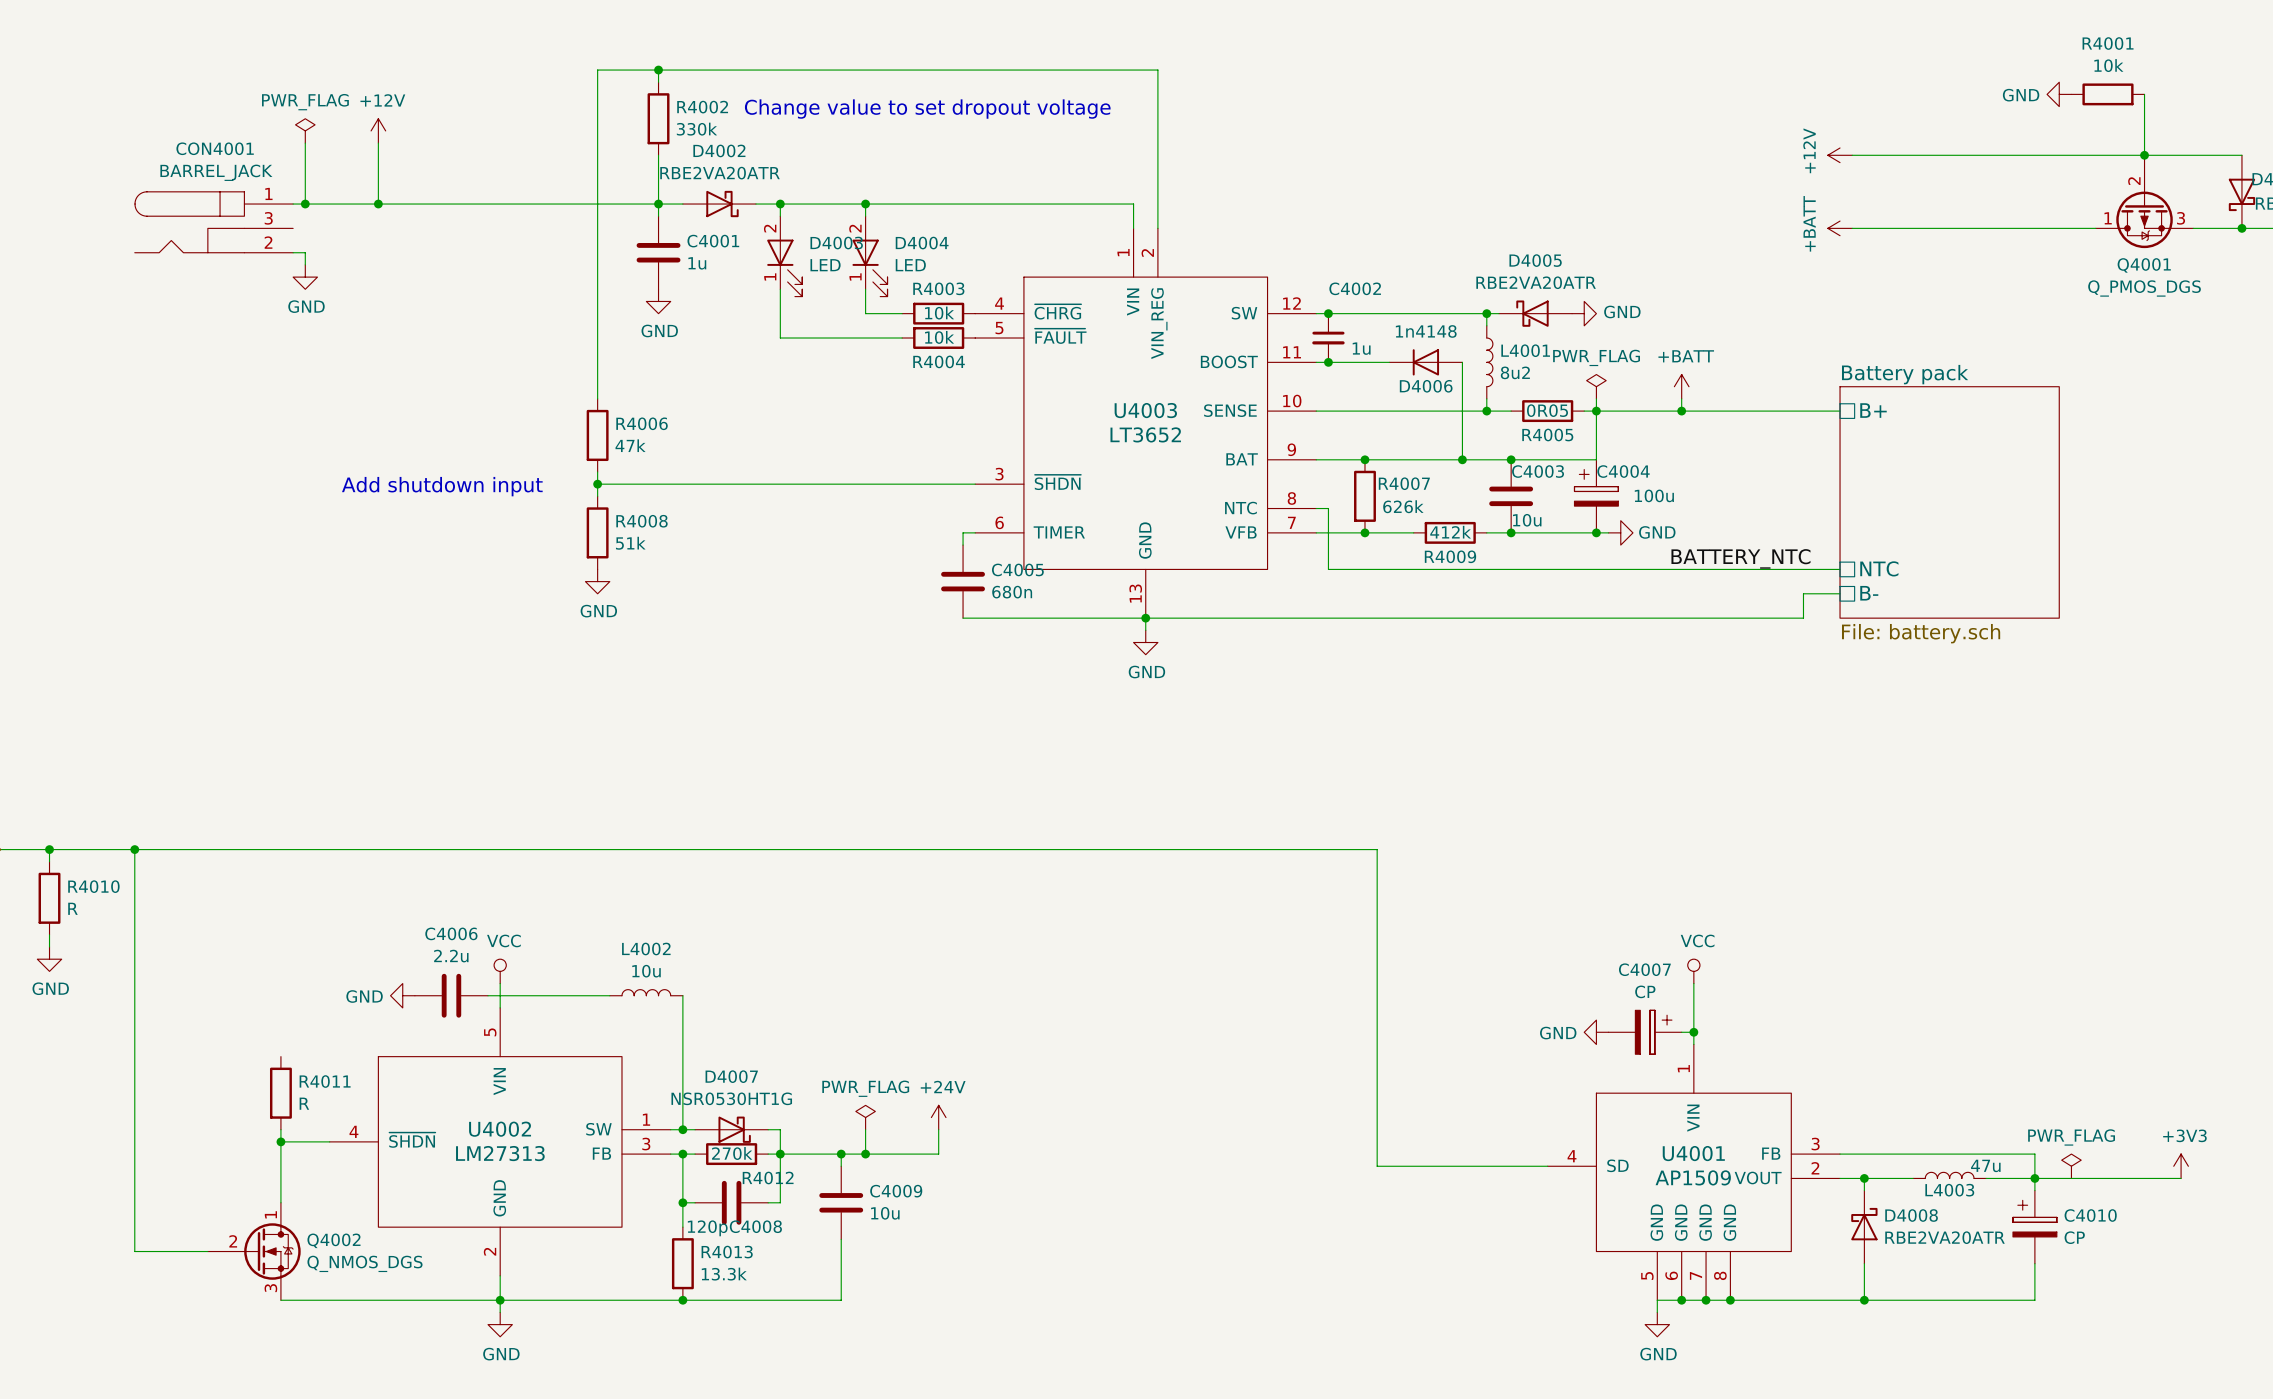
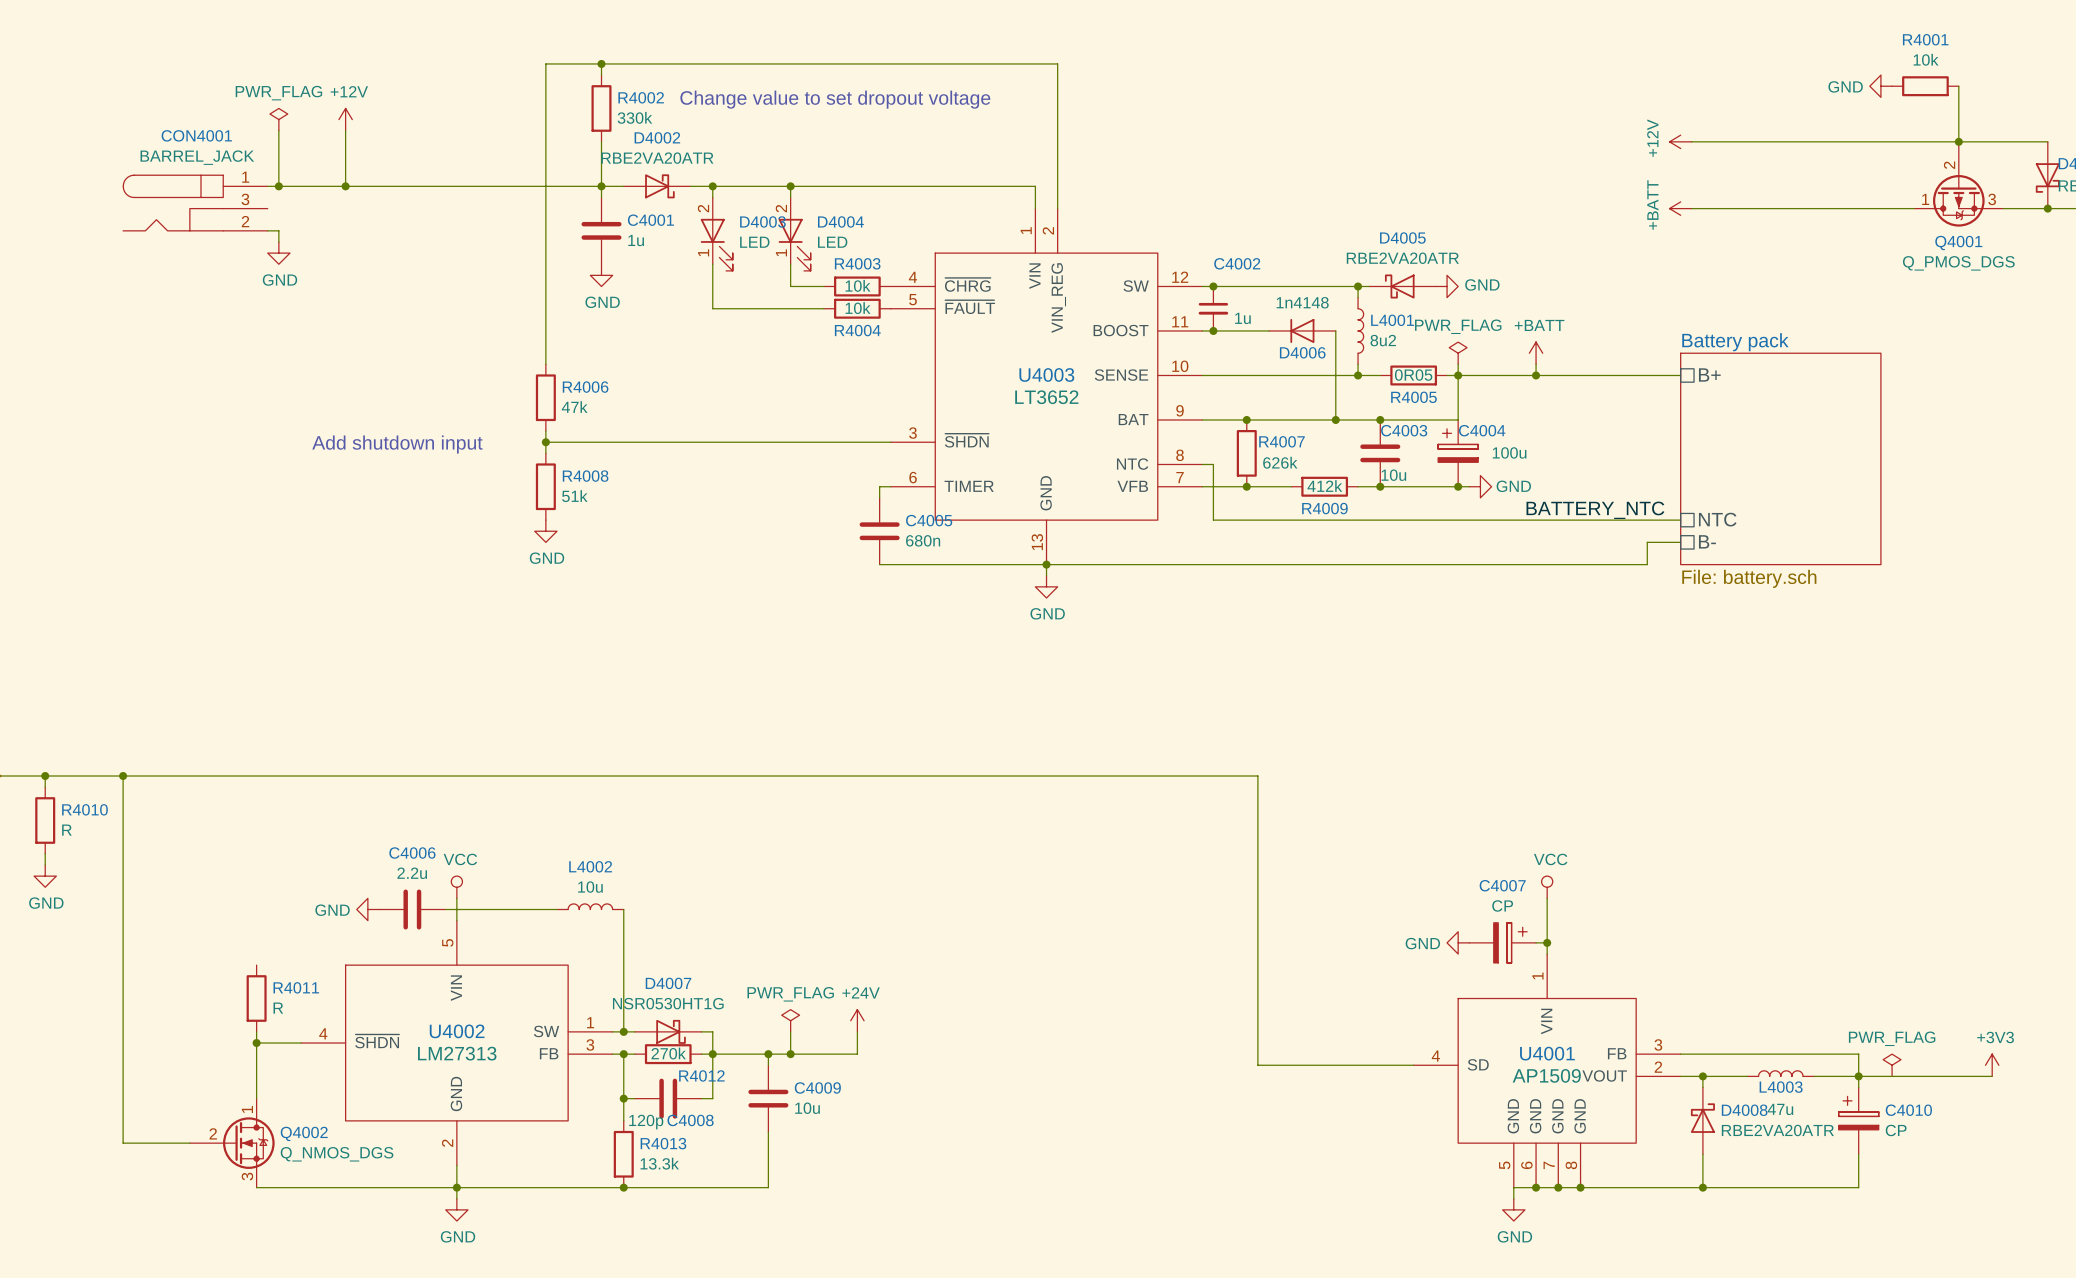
L4003 value position: 47u (1985, 1165) -> 47u (1780, 1109)

